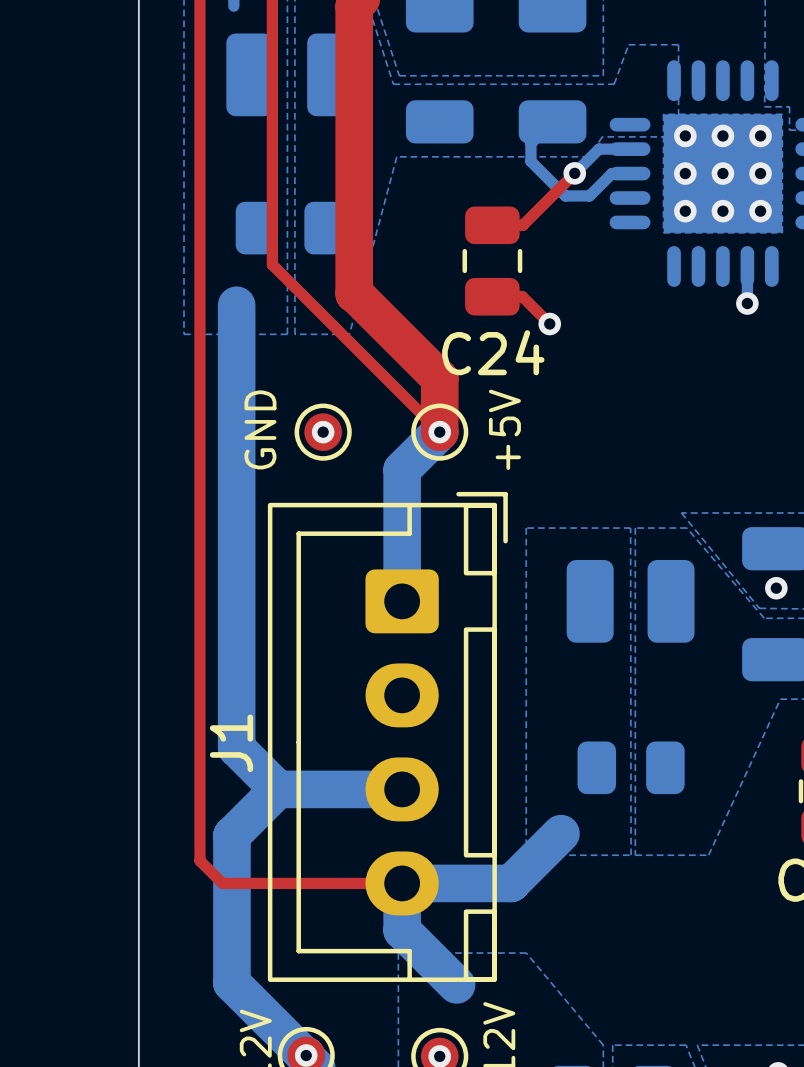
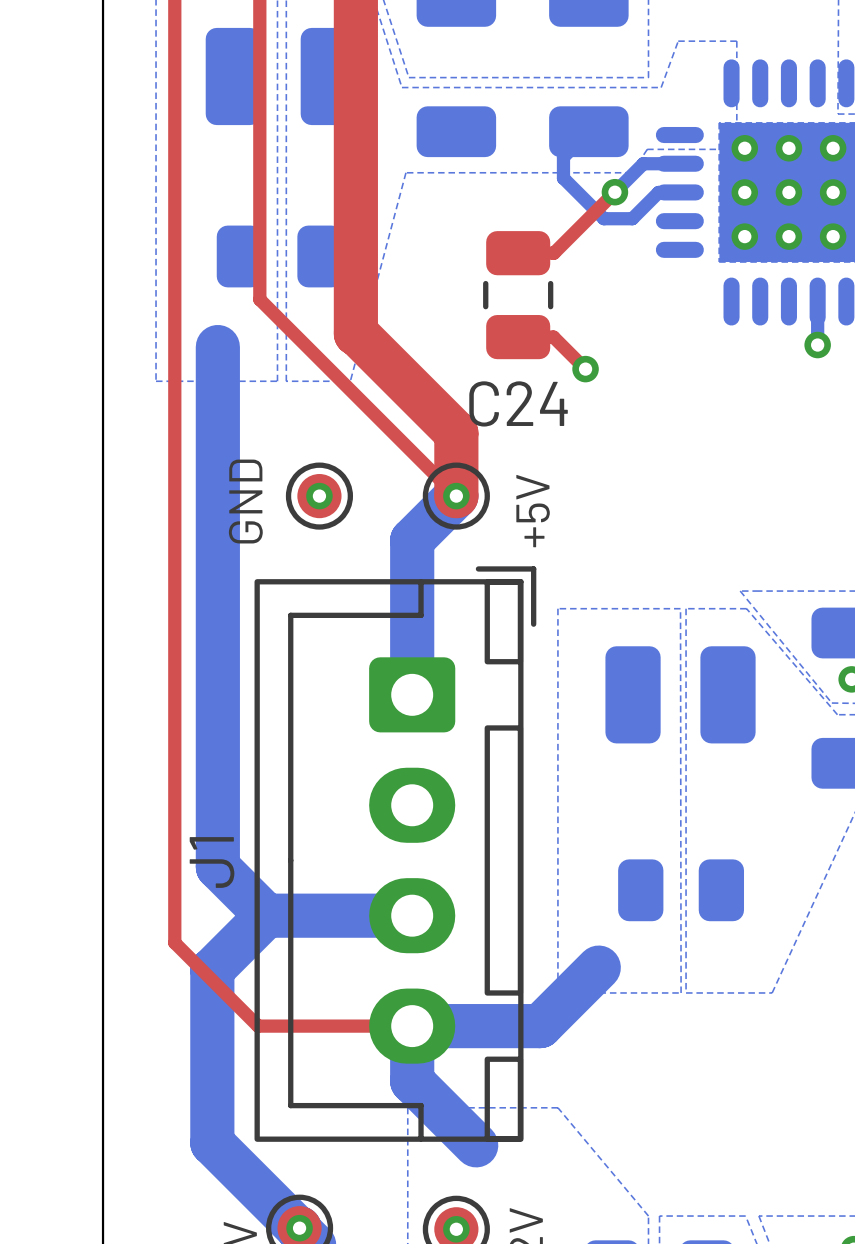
top track: (199, 812) (199, 860) (222, 883) (270, 883) -> (174, 942) (258, 1026)

